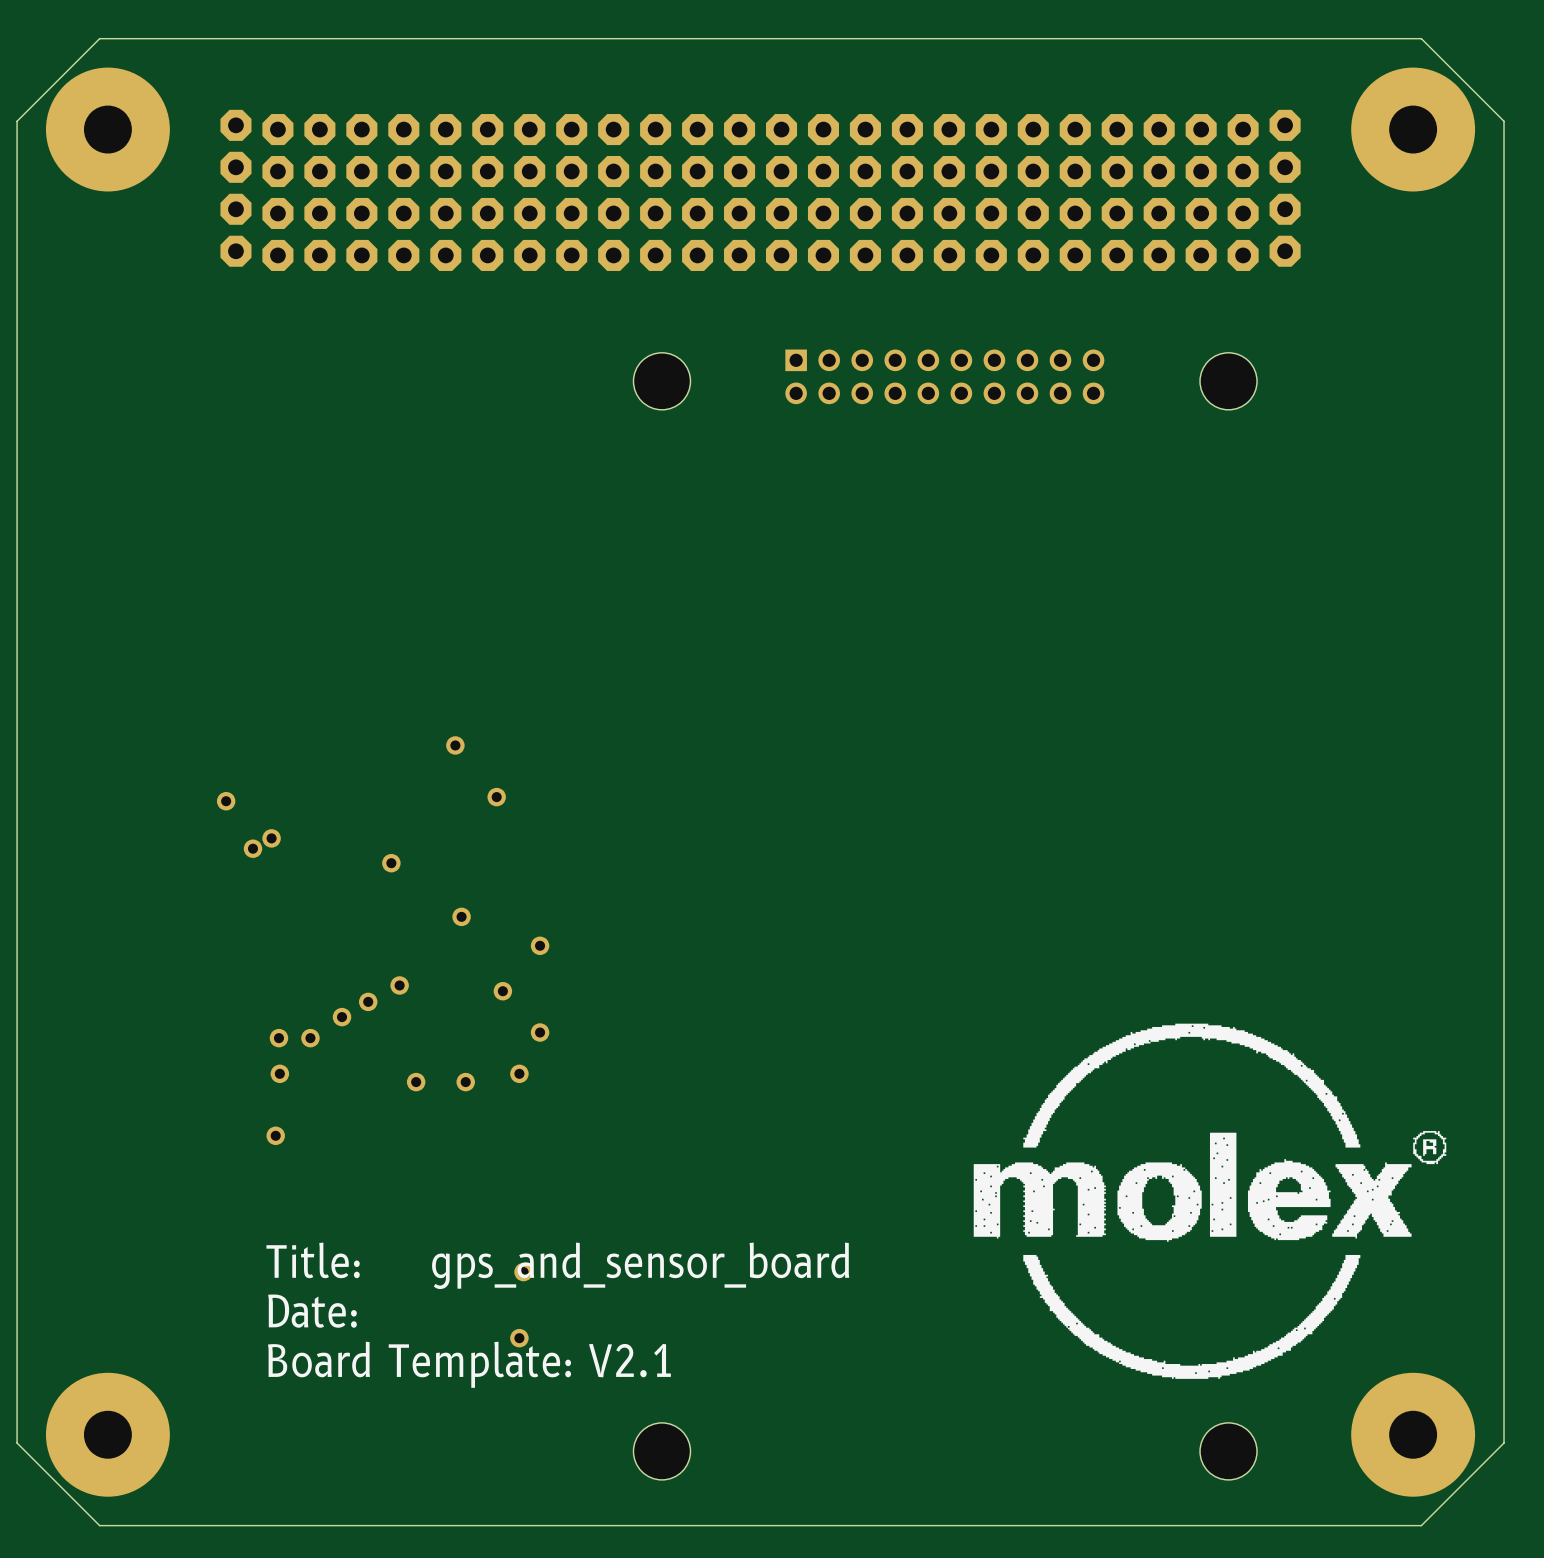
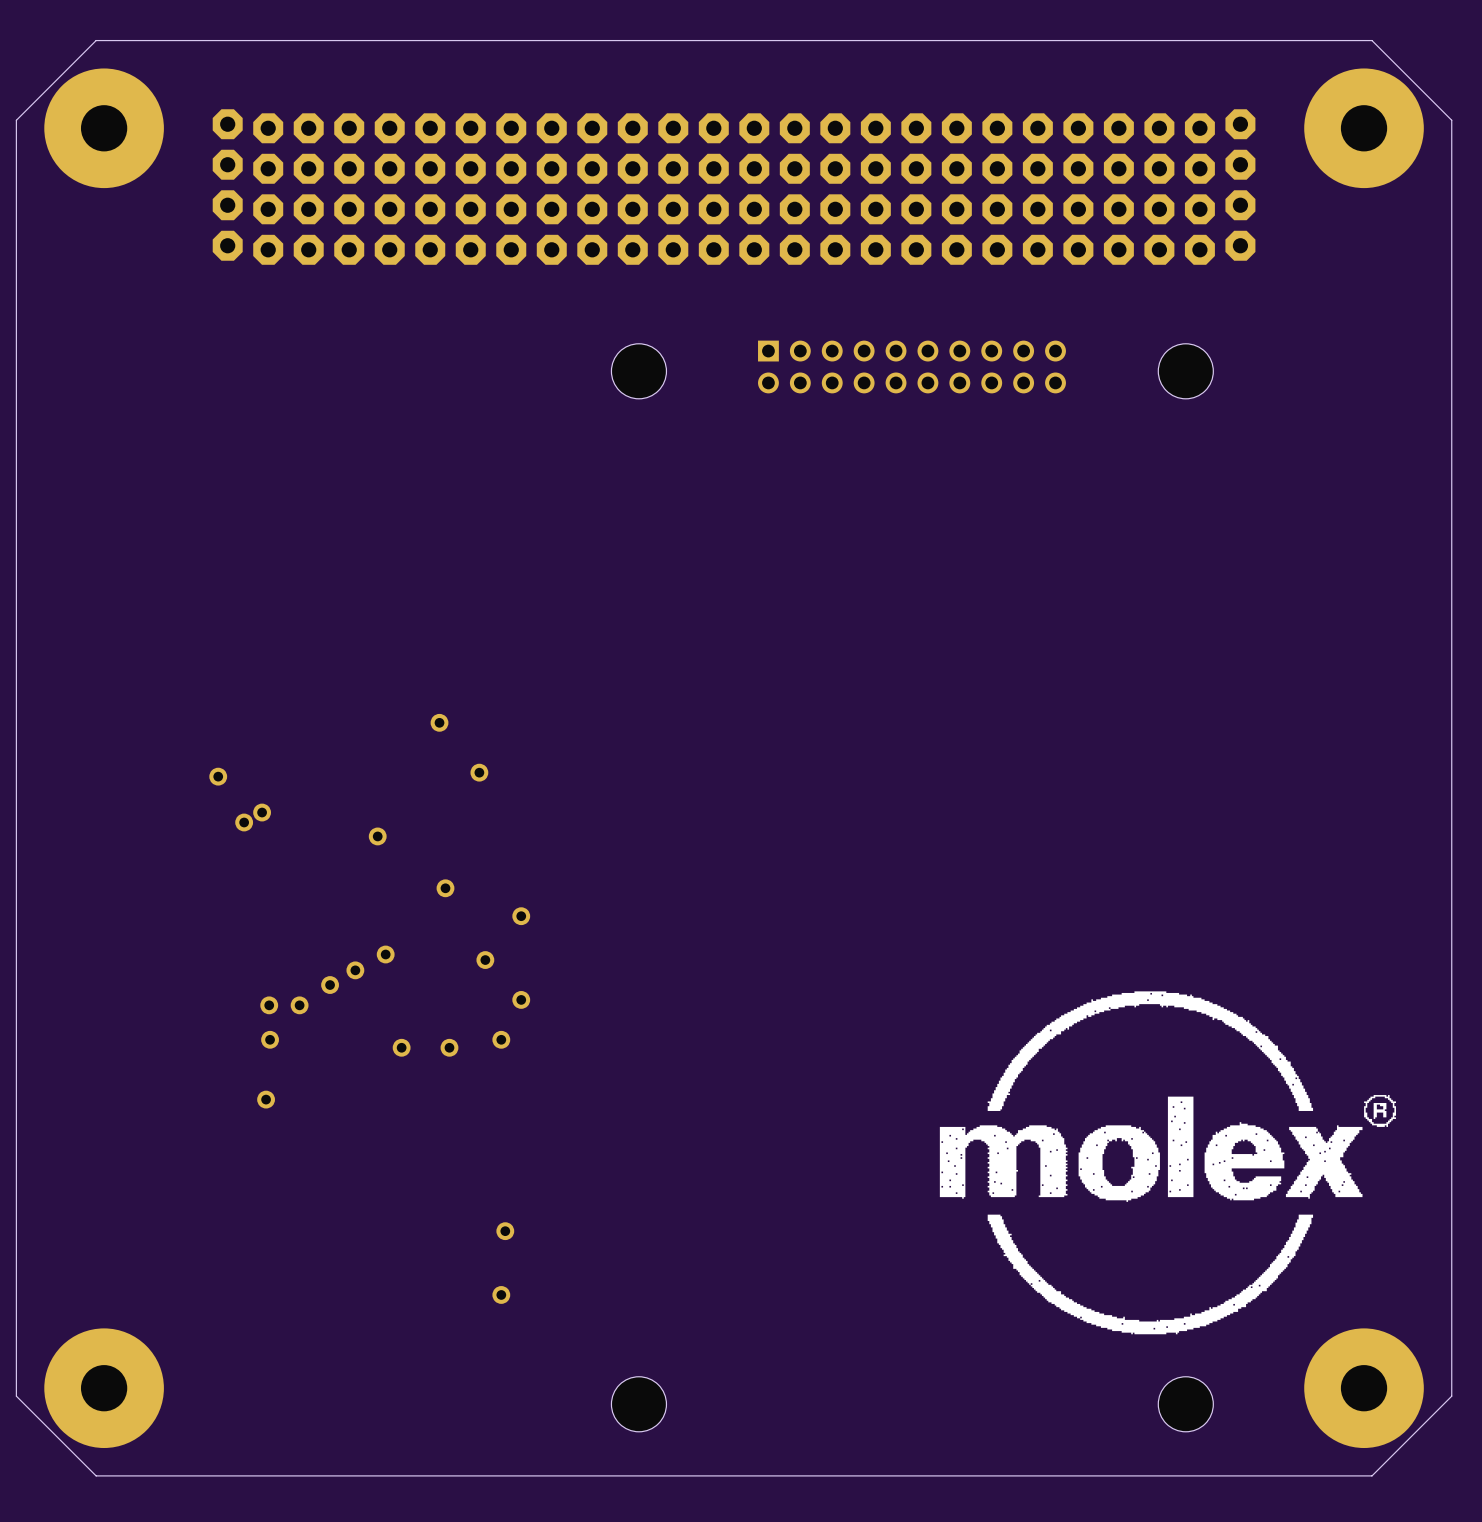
part text: Title: (313, 1260) -> none
part text: gps_and_sensor_board (640, 1265) -> none
part text: Date: (312, 1311) -> none
part text: Board Template: V2.1 (469, 1364) -> none

